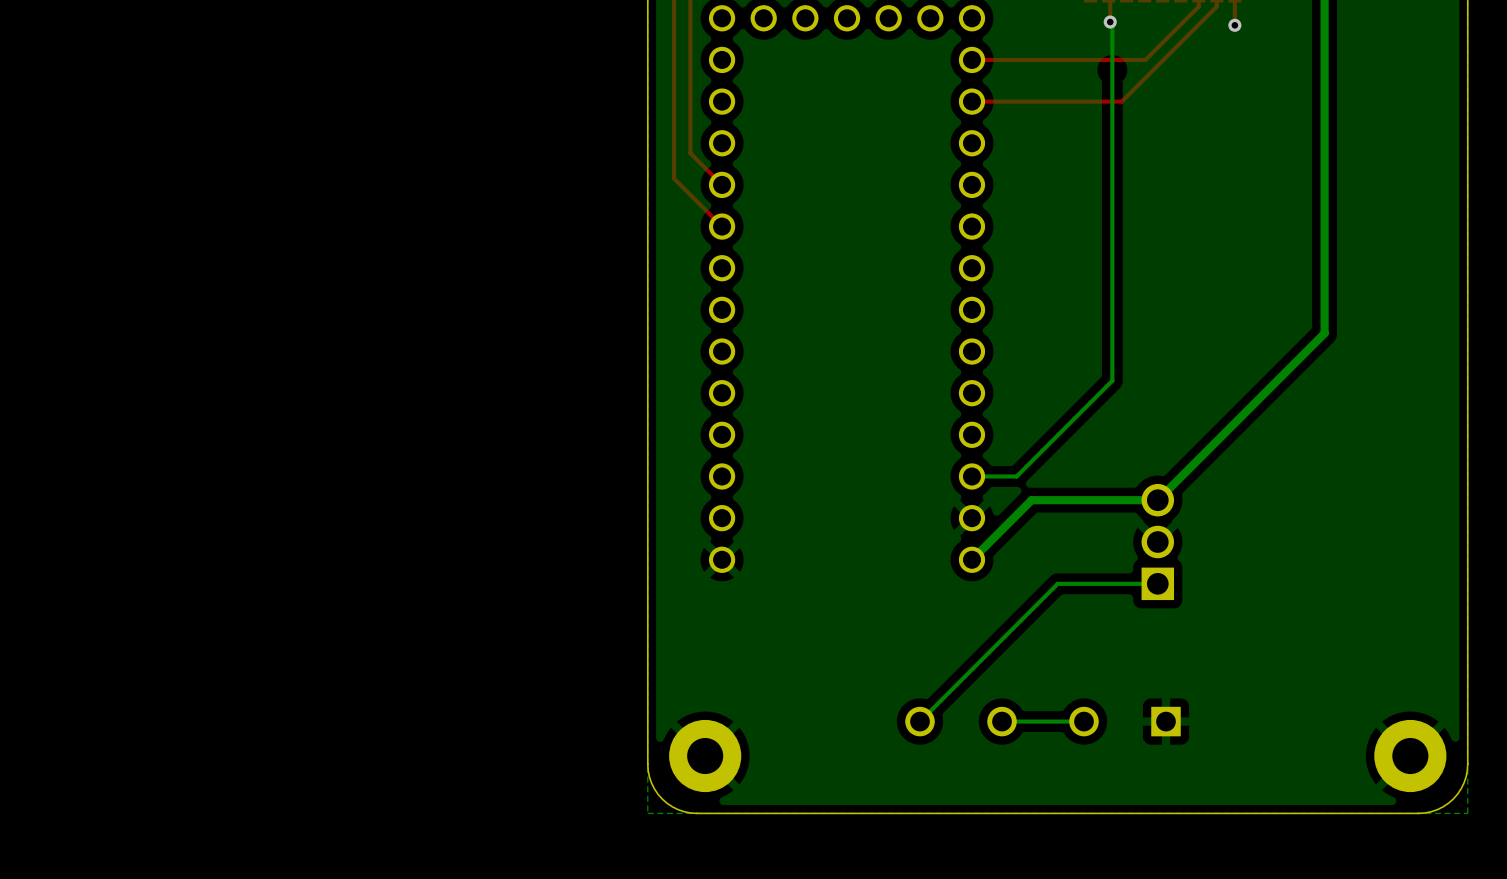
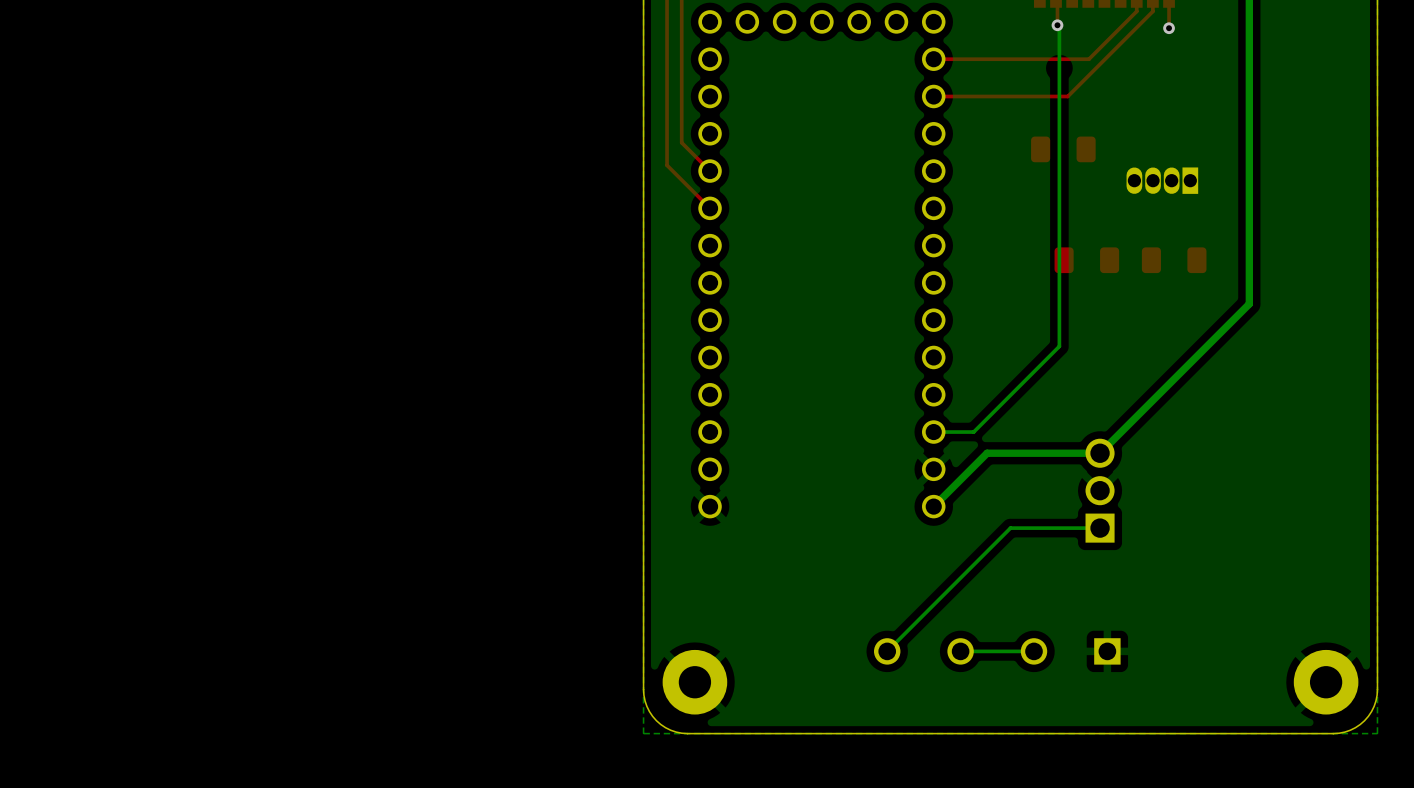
part: none -> (1063, 149)
part: none -> (1162, 180)
part: none -> (1086, 260)
part: none -> (1174, 260)

